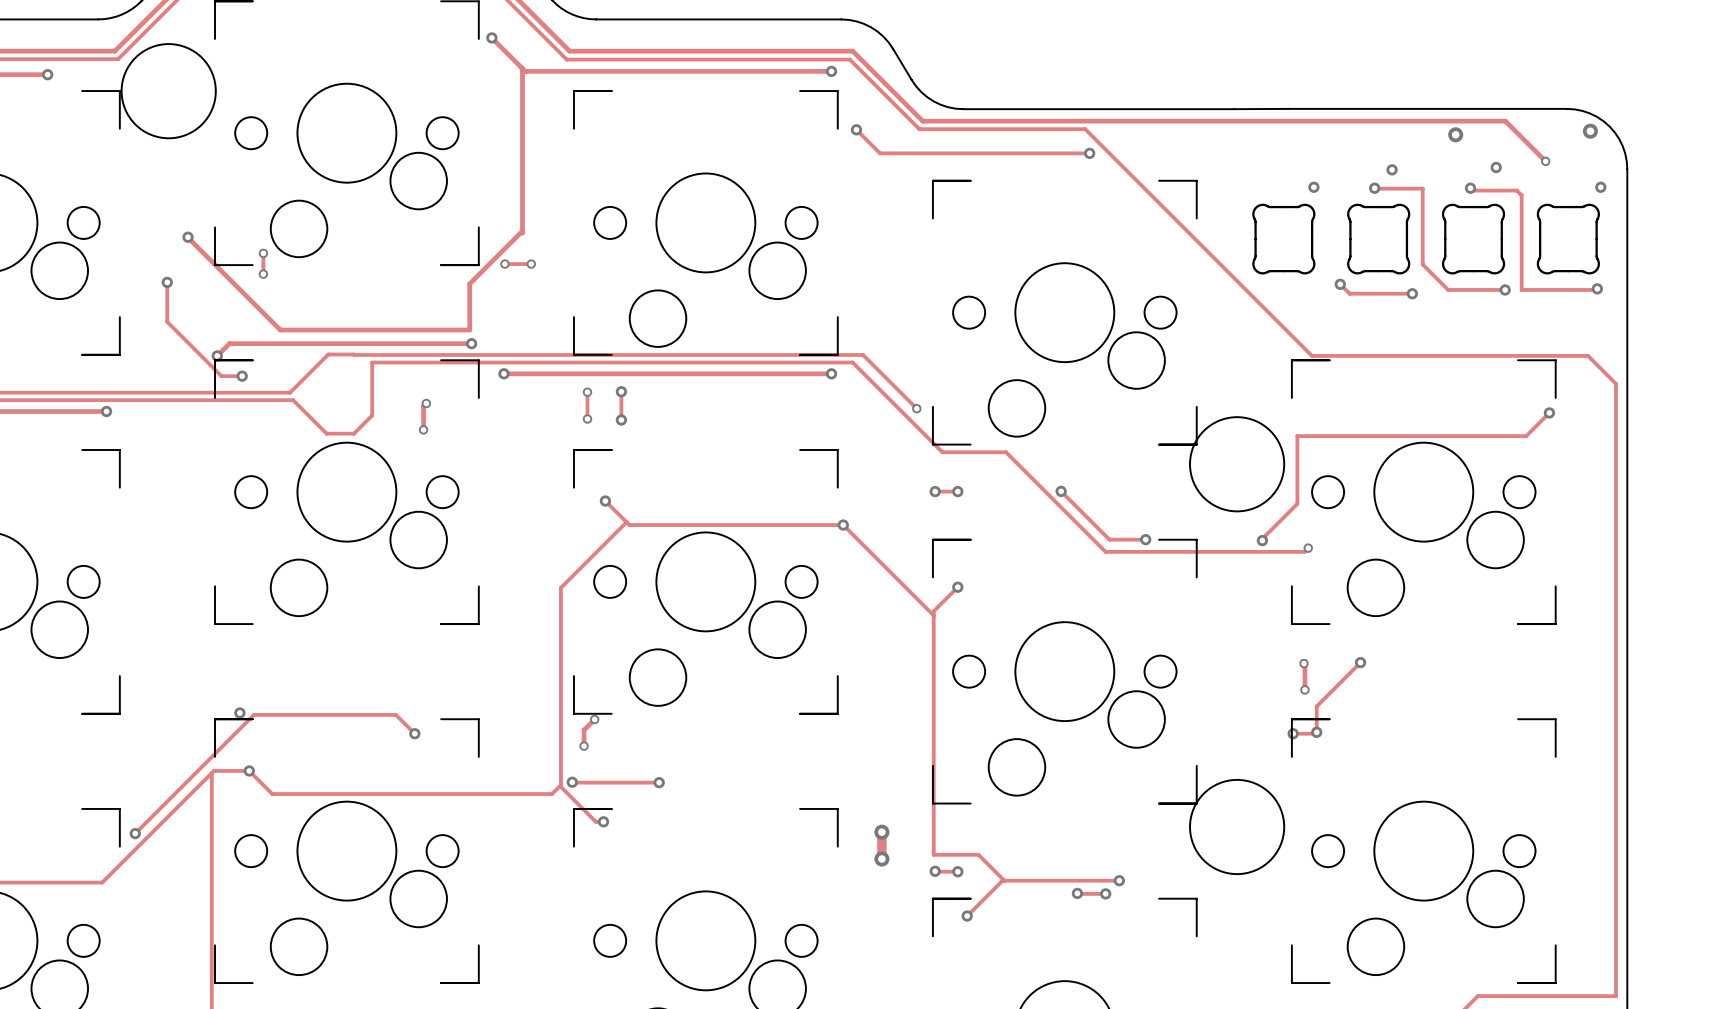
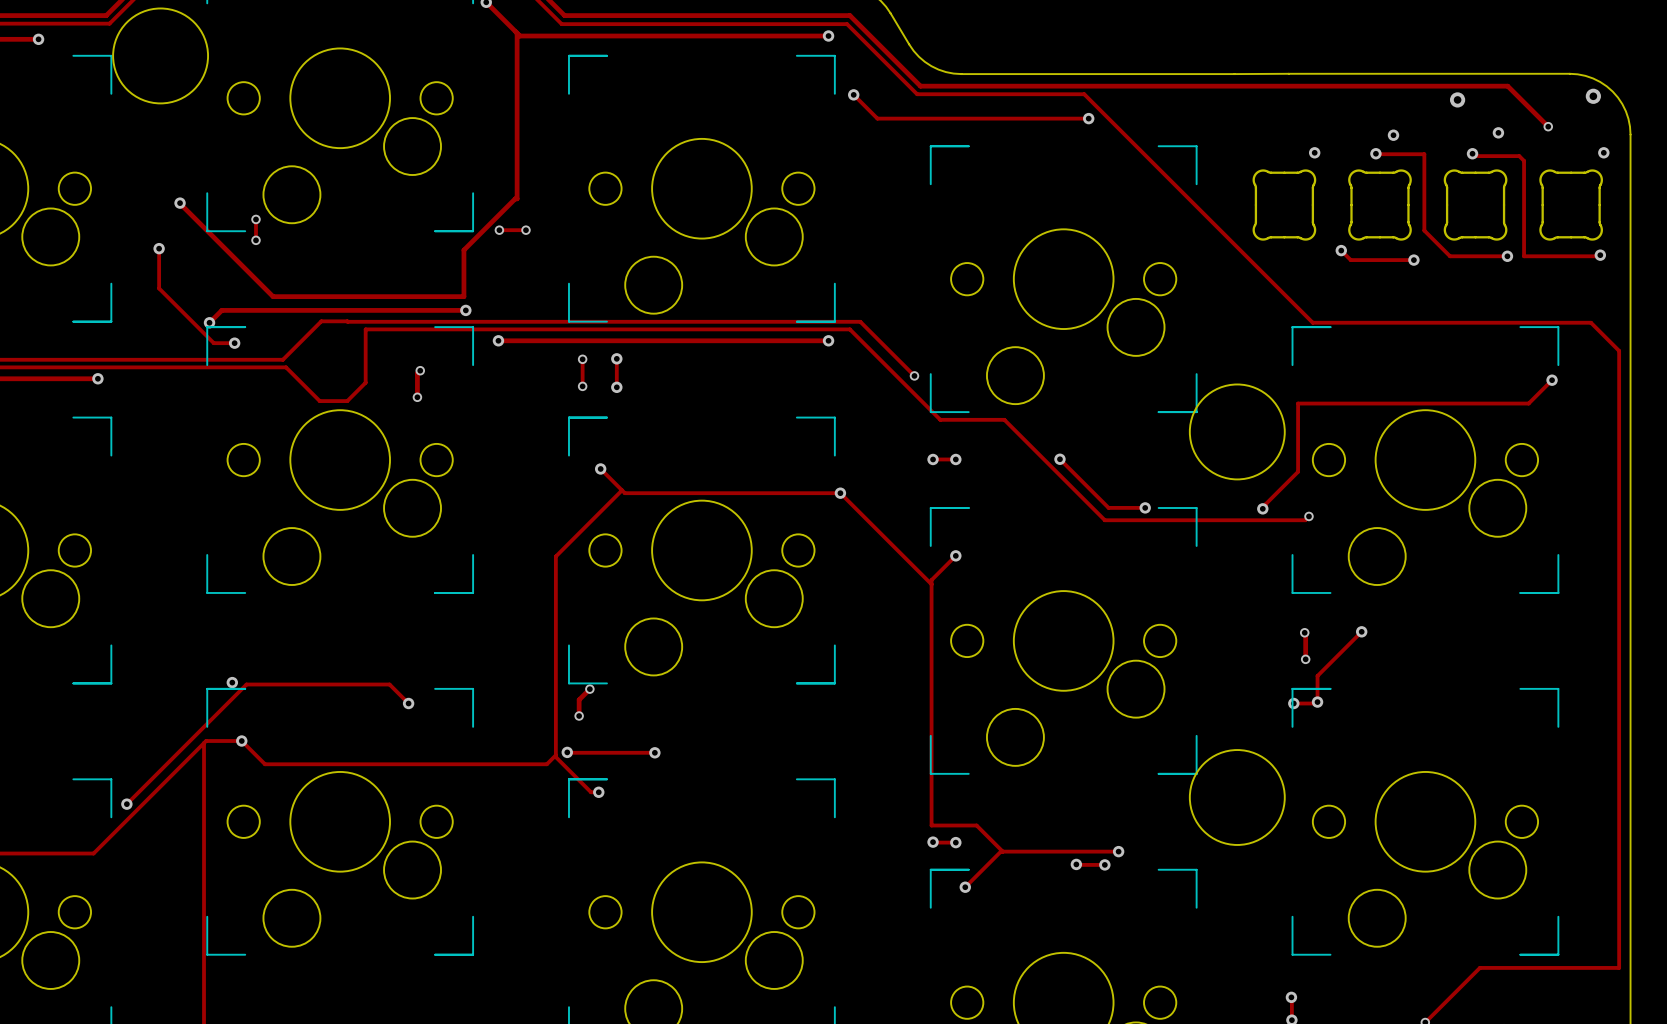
track: (881, 832) (881, 859) -> none
via: (881, 832) -> none
via: (881, 859) -> none

